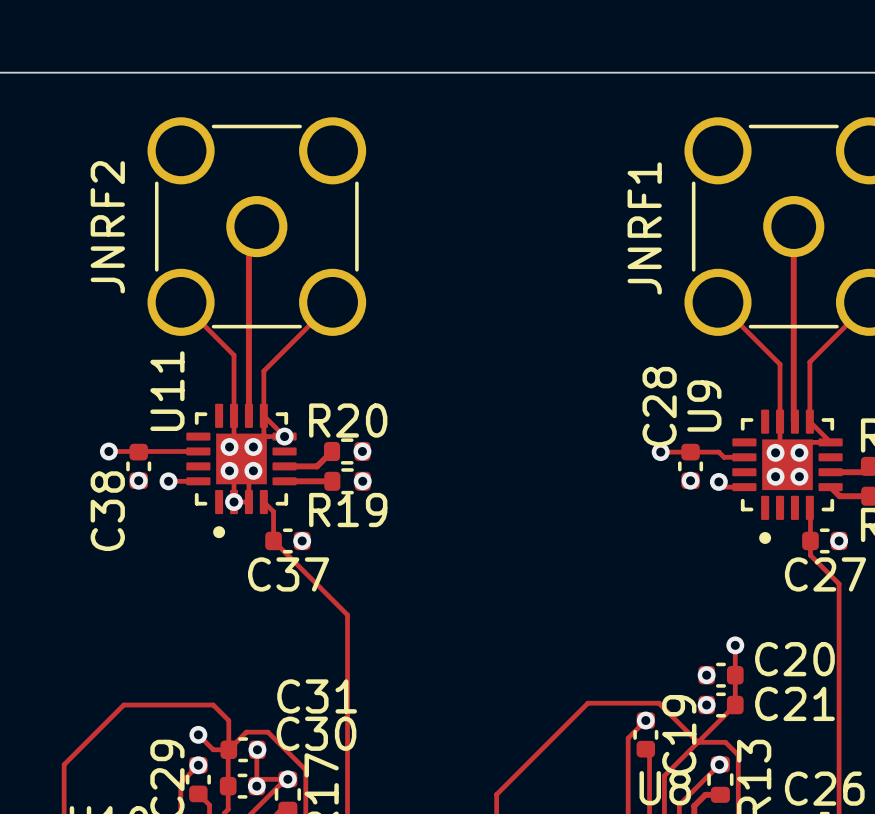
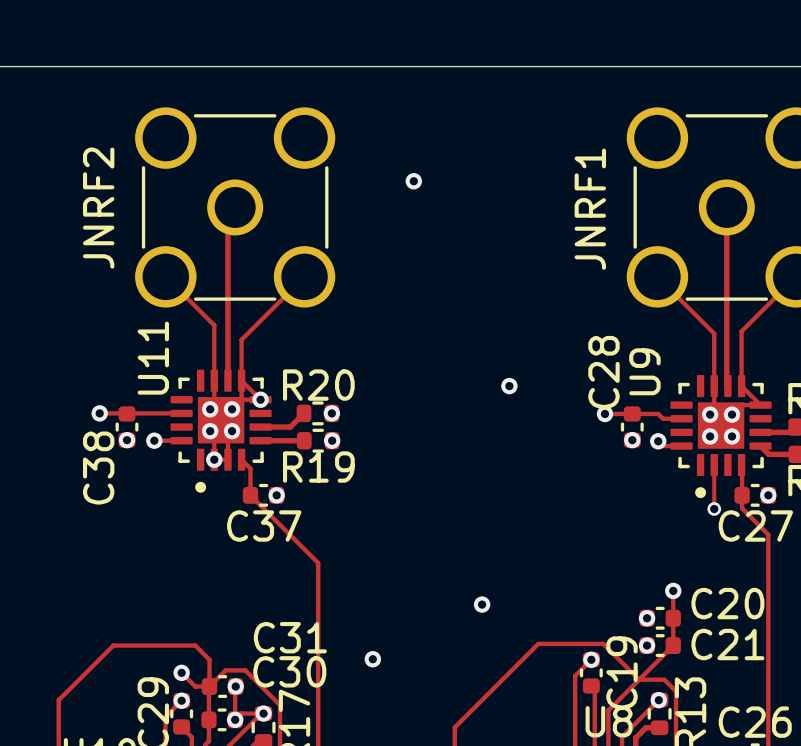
via: none -> (413, 181)
via: none -> (509, 386)
track: none -> (714, 465) (714, 509)
via: none -> (714, 509)
via: none -> (482, 604)
via: none -> (372, 659)

